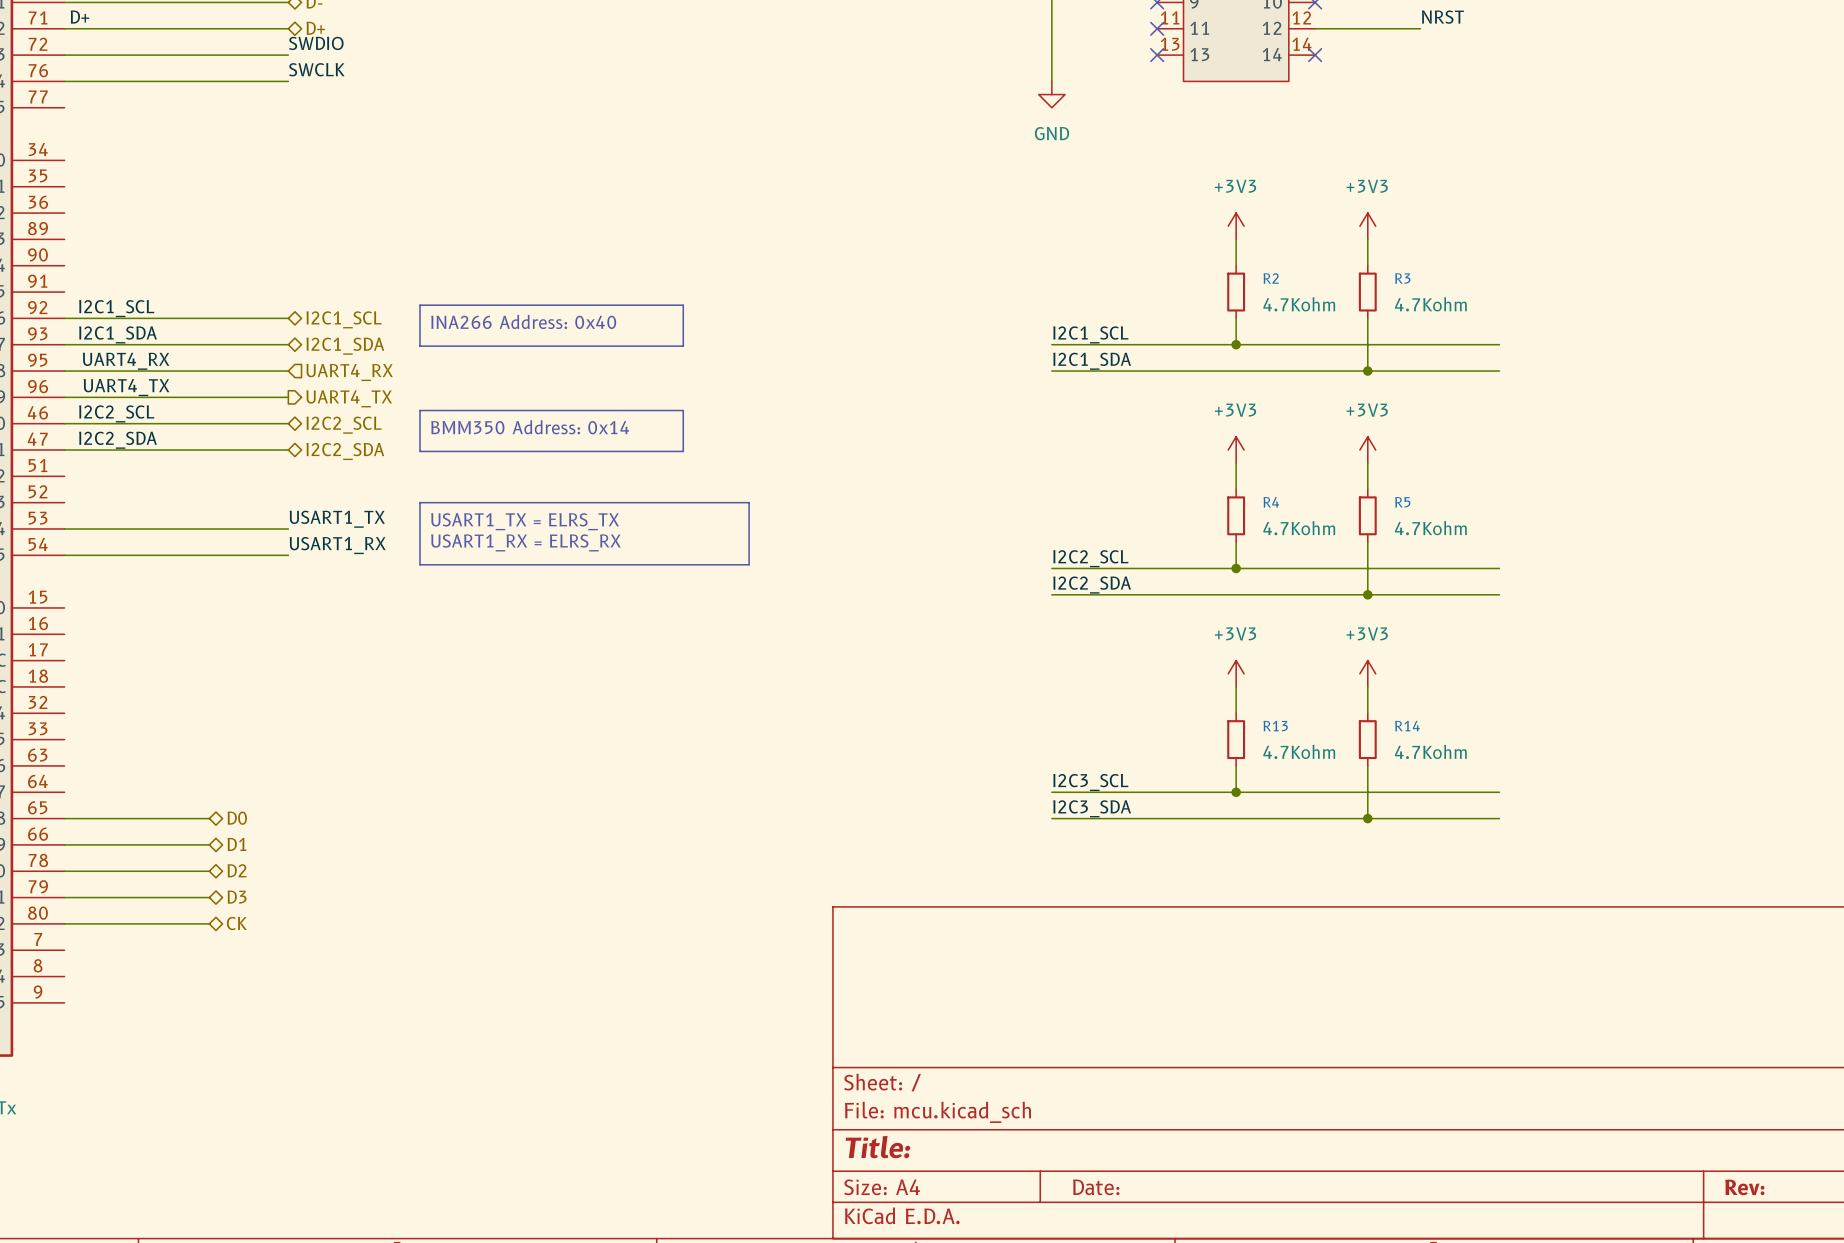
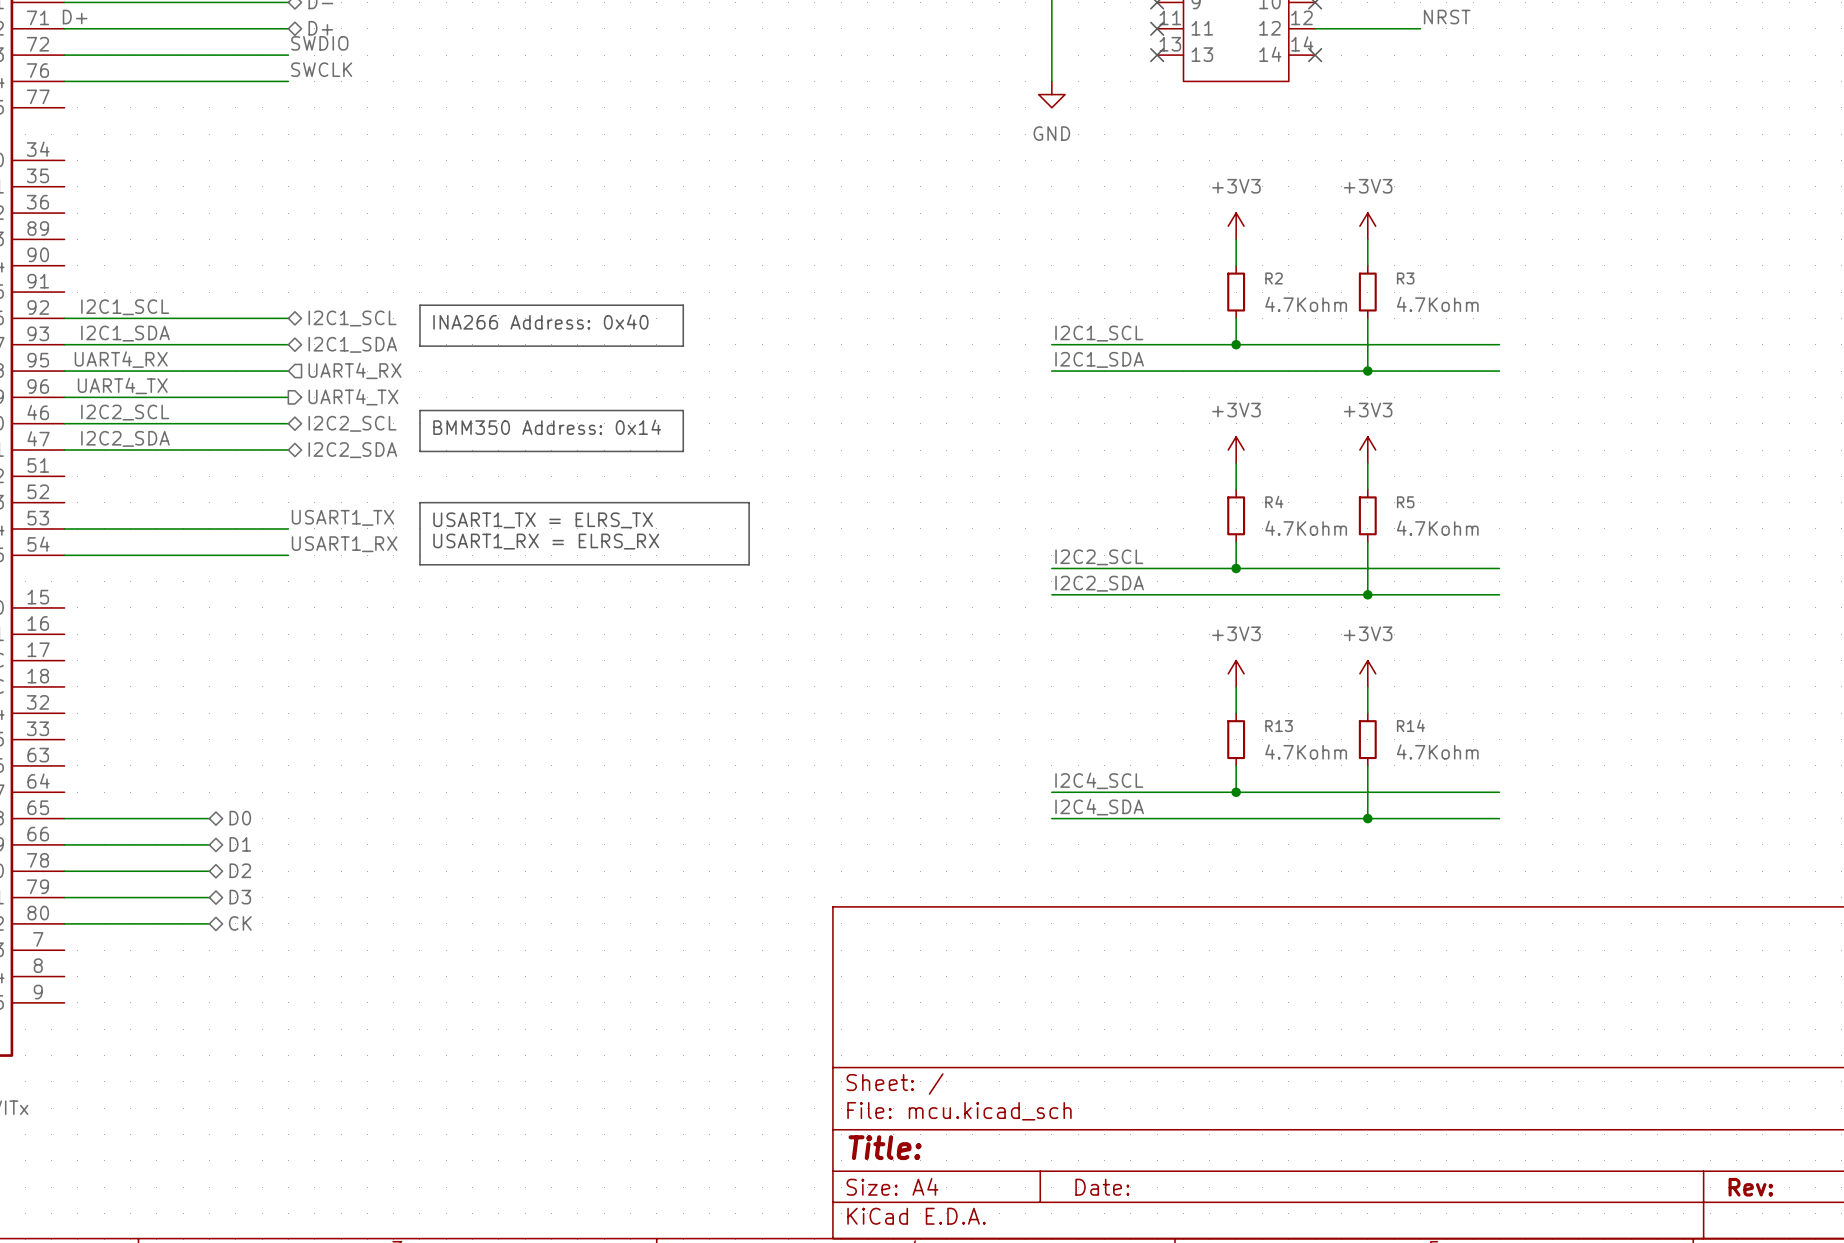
label: I2C3_SCL (1090, 782) -> I2C4_SCL (1099, 780)
label: I2C3_SDA (1092, 808) -> I2C4_SDA (1099, 807)

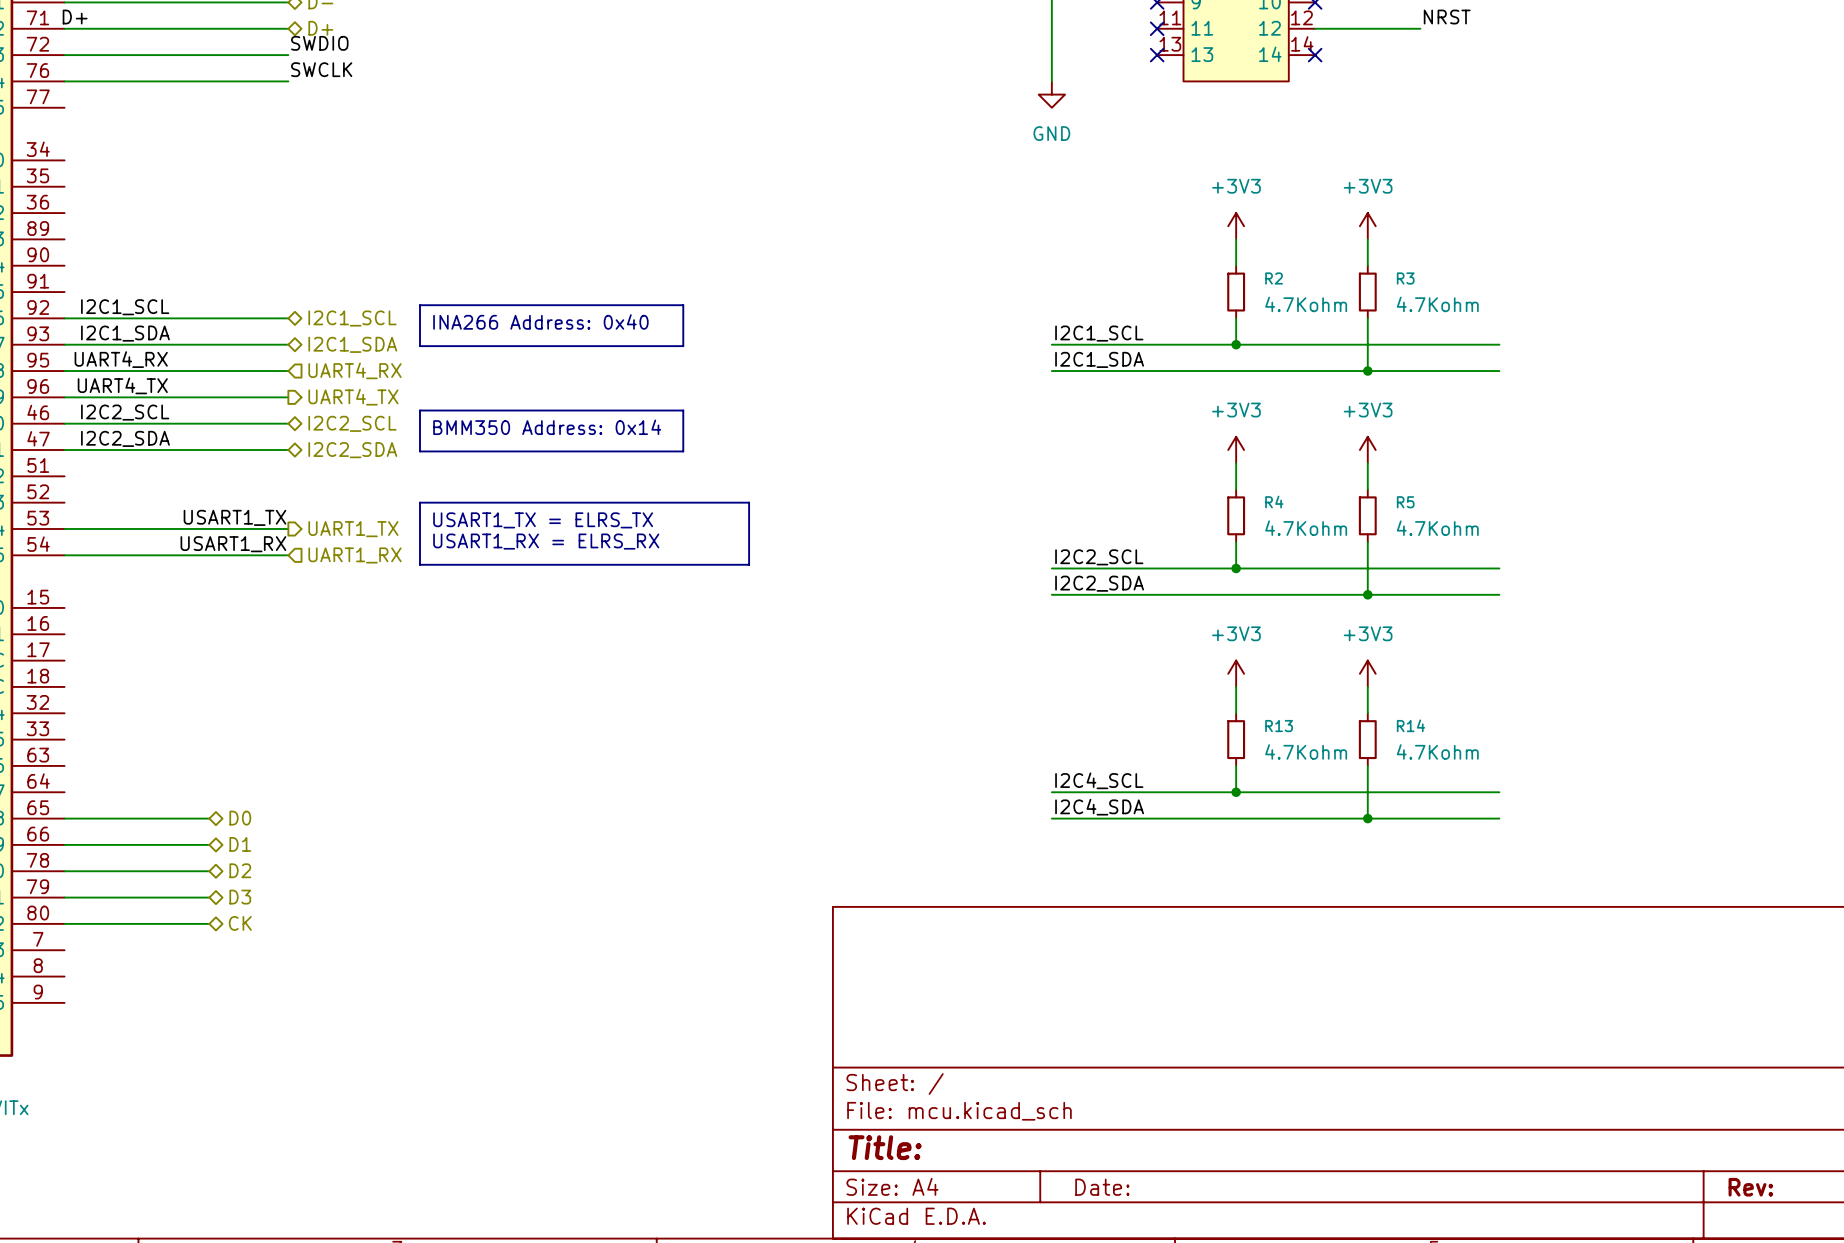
label position: USART1_TX (342, 517) -> USART1_TX (234, 517)
hierarchical label: none -> UART1_TX (353, 529)
label position: USART1_RX (344, 544) -> USART1_RX (233, 544)
hierarchical label: none -> UART1_RX (355, 555)

